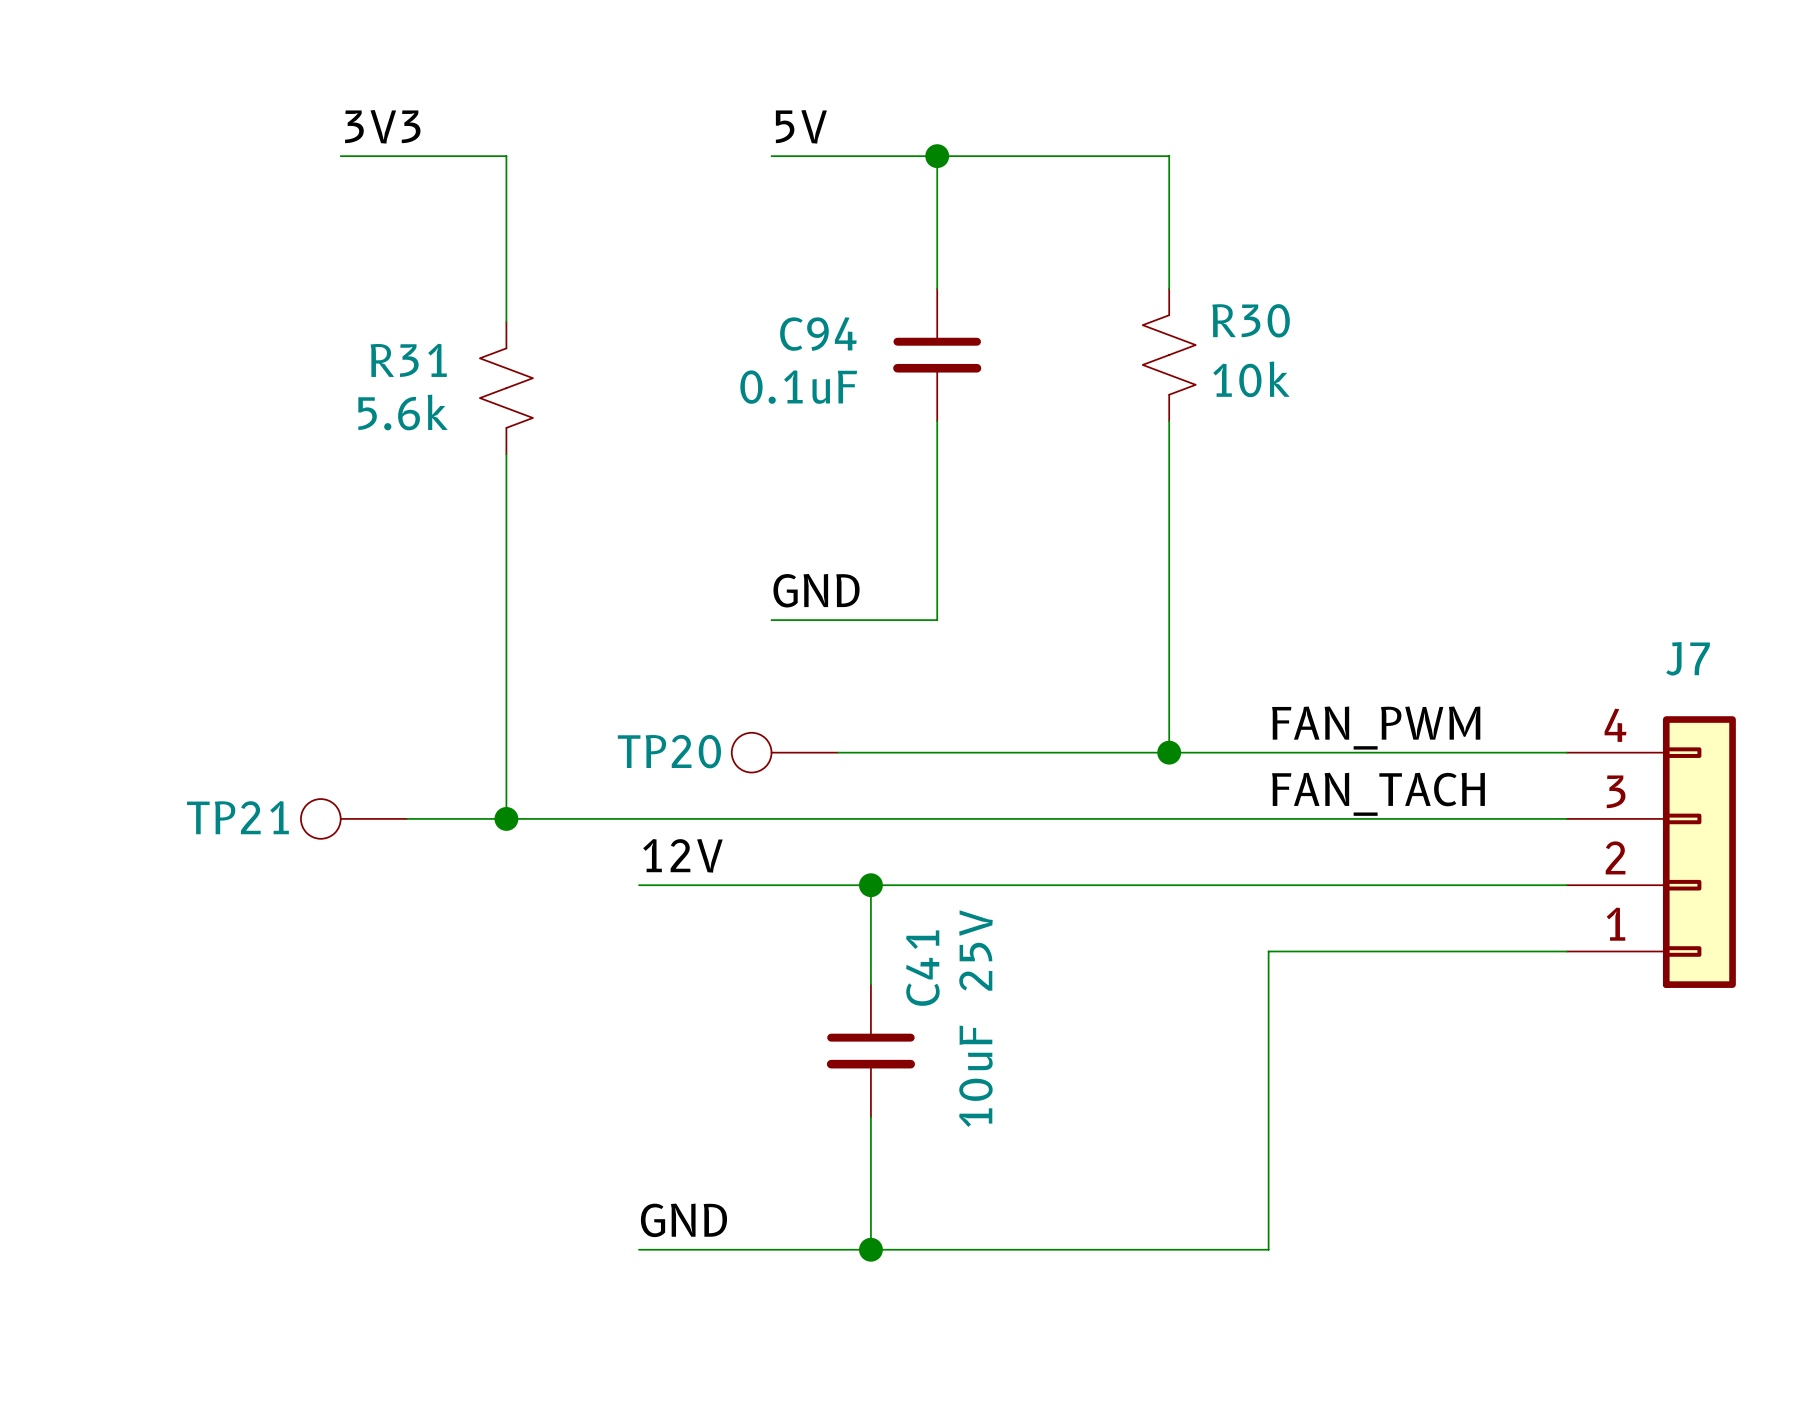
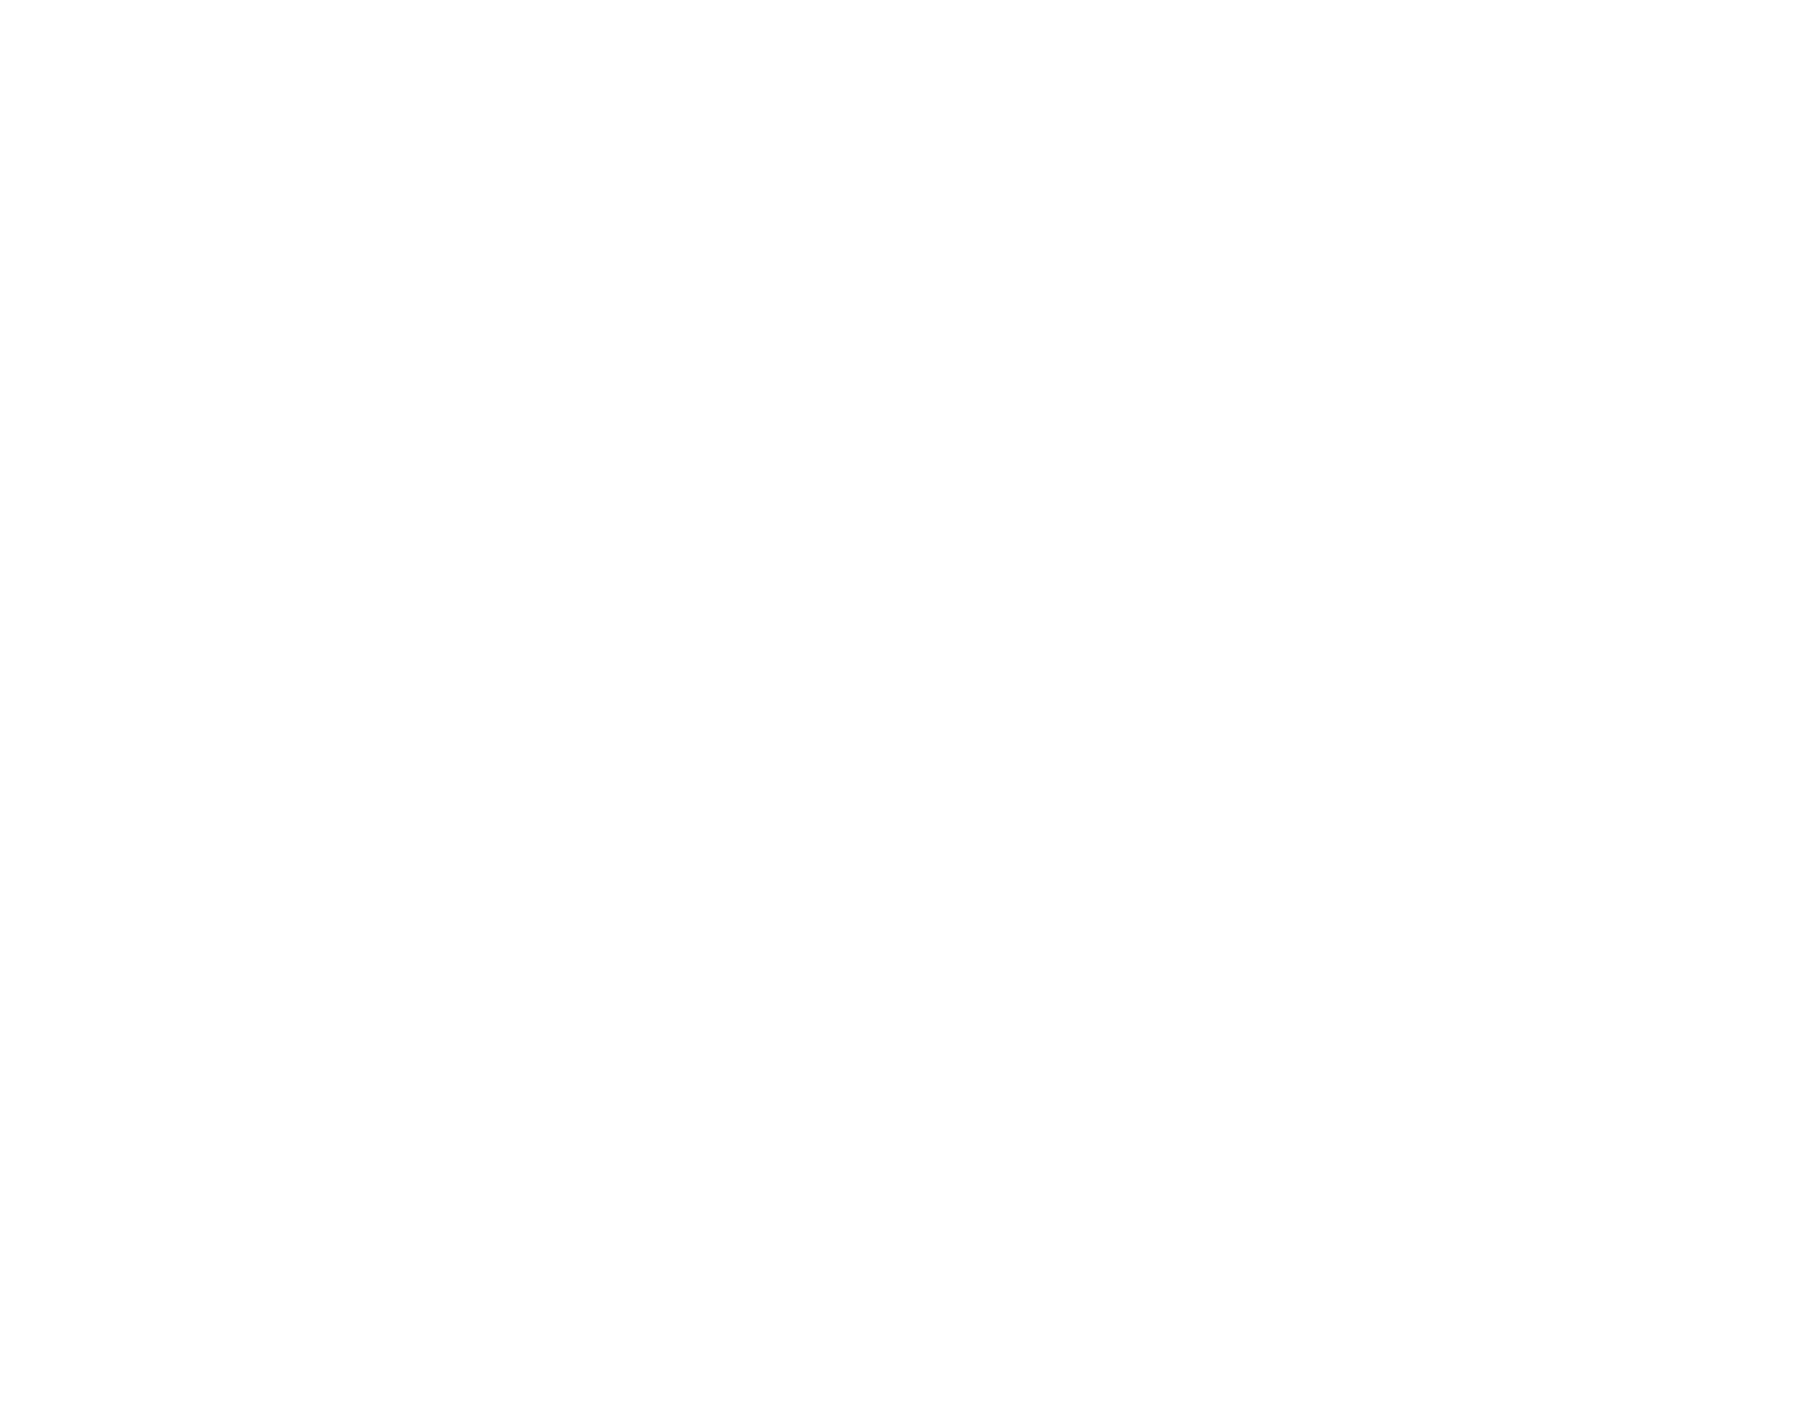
label: 3V3 (382, 126) -> none
label: 5V (801, 126) -> none
wire: (340, 156) (506, 156) (506, 321) -> none
wire: (771, 156) (1169, 156) (1169, 288) -> none
wire: (937, 156) (937, 288) -> none
junction: (937, 156) -> none
C94: 0.1uF (937, 354) -> none
R30: 10k (1169, 354) -> none
R31: 5.6k (506, 388) -> none
wire: (937, 421) (937, 620) (771, 620) -> none
wire: (1169, 421) (1169, 752) -> none
wire: (506, 454) (506, 818) -> none
label: GND (816, 590) -> none
label: FAN_PWM (1376, 728) -> none
TP20: (784, 752) -> none
wire: (837, 752) (1566, 752) -> none
junction: (1169, 752) -> none
label: FAN_TACH (1378, 794) -> none
TP21: (353, 818) -> none
wire: (406, 818) (1566, 818) -> none
junction: (506, 818) -> none
J7: (1651, 852) -> none
label: 12V (682, 855) -> none
wire: (638, 885) (1566, 885) -> none
wire: (870, 885) (870, 984) -> none
junction: (870, 885) -> none
wire: (1566, 951) (1268, 951) (1268, 1249) (638, 1249) -> none
C41: 10uF (870, 1050) -> none
wire: (870, 1117) (870, 1249) -> none
label: GND (683, 1220) -> none
junction: (870, 1249) -> none

